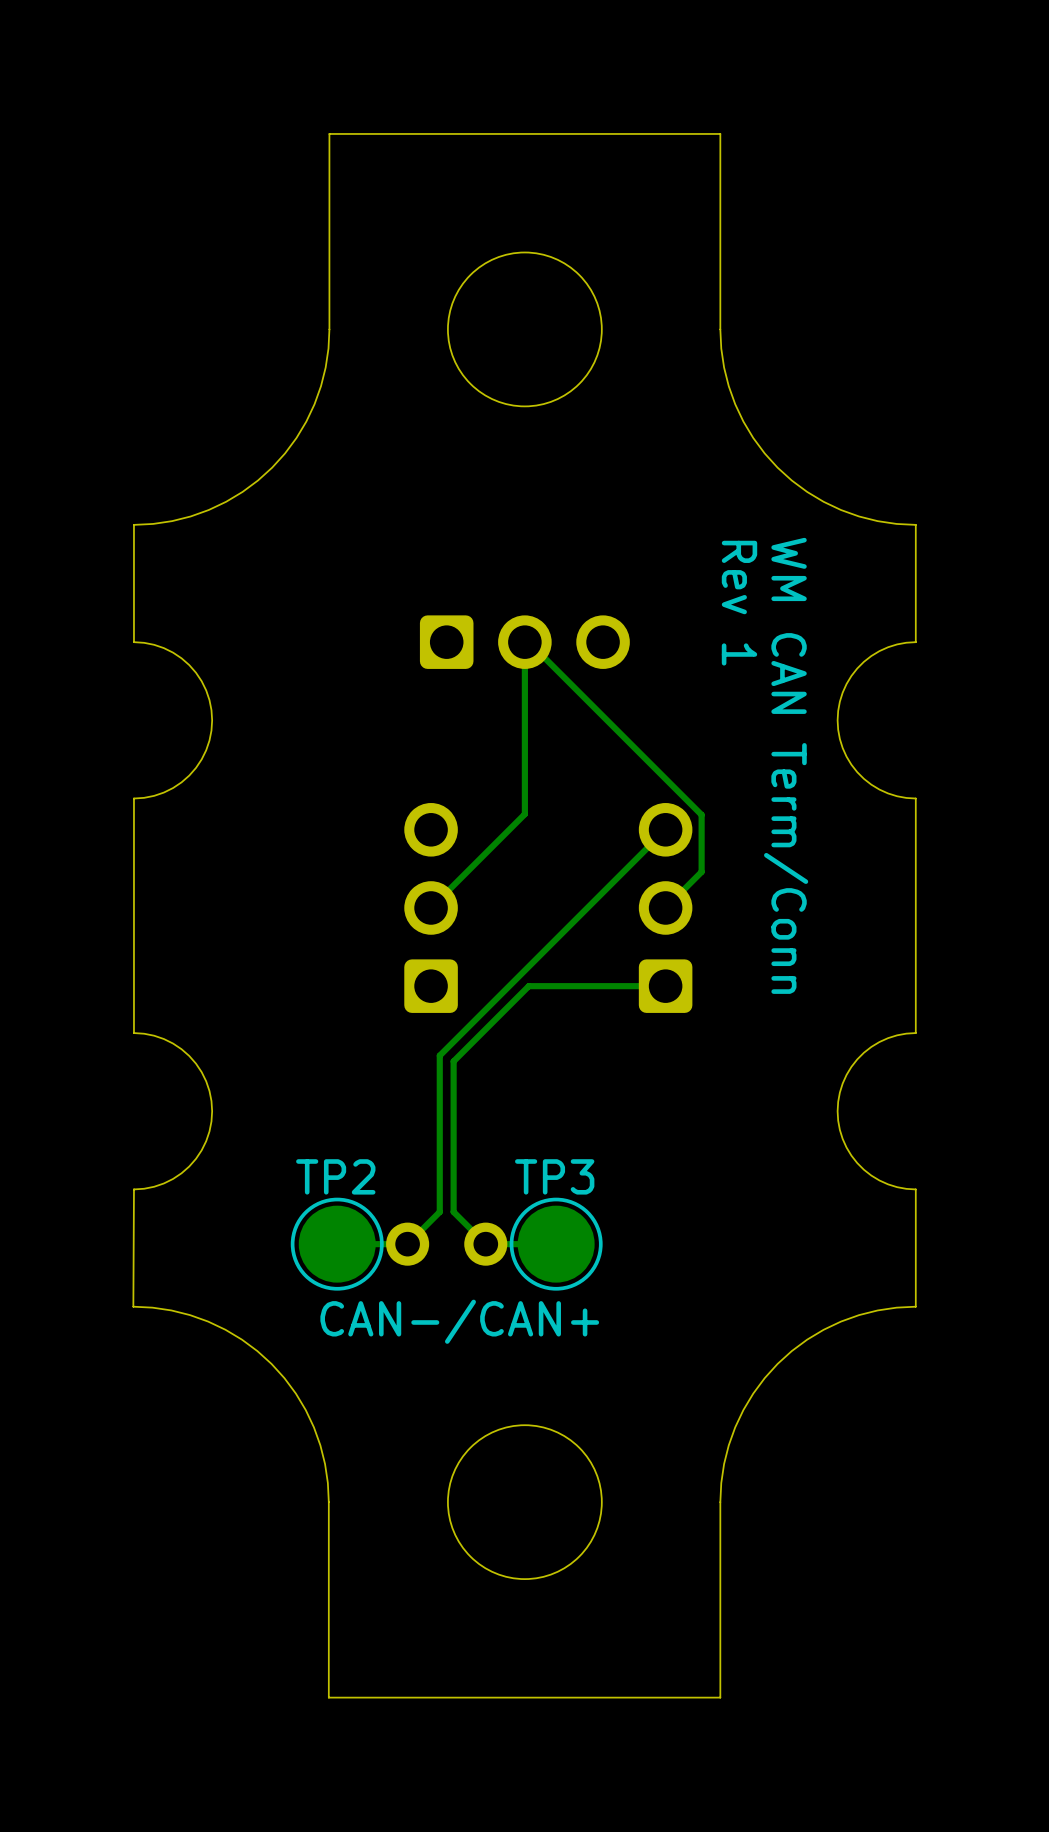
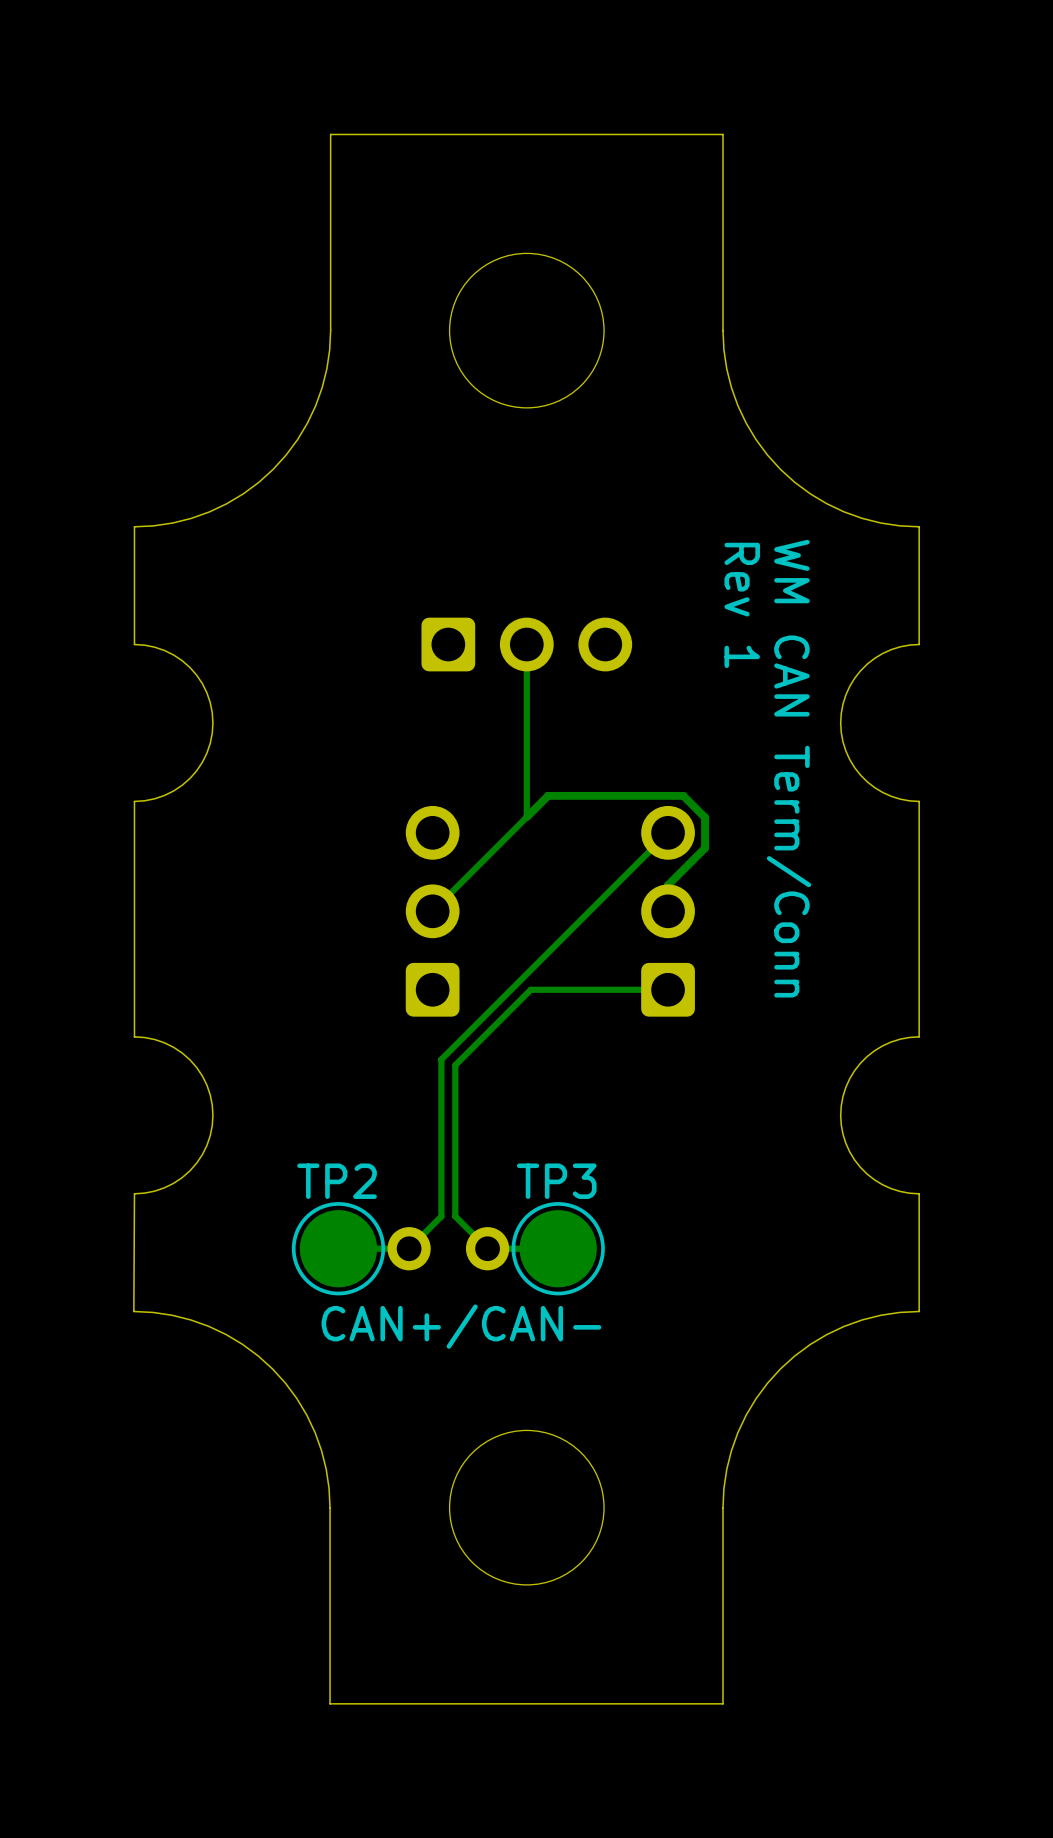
track: (524, 642) (528, 642) (701, 814) (701, 871) (665, 907) -> (526, 817) (548, 795) (683, 795) (705, 817) (705, 848) (668, 885) (668, 911)
text: CAN-/CAN+ (459, 1321) -> CAN+/CAN- (461, 1326)

